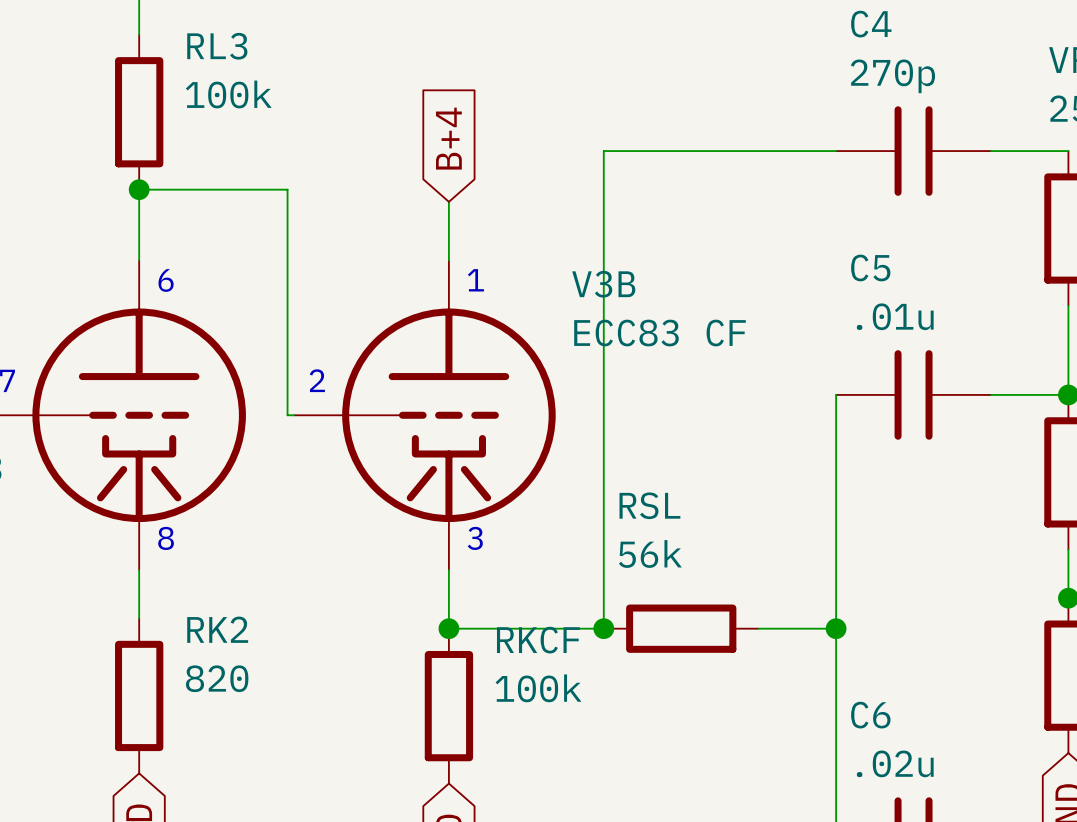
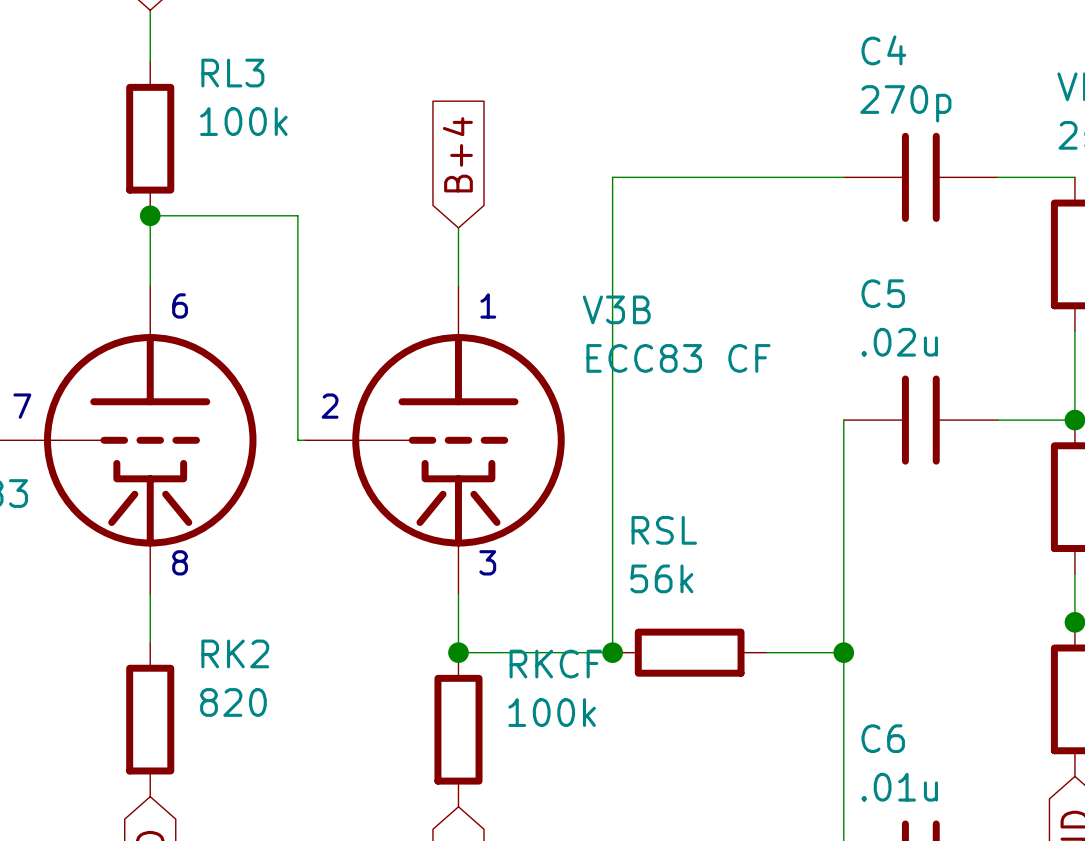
C5 value: .01u (895, 316) -> .02u (899, 342)
C6 value: .02u (895, 763) -> .01u (899, 787)

